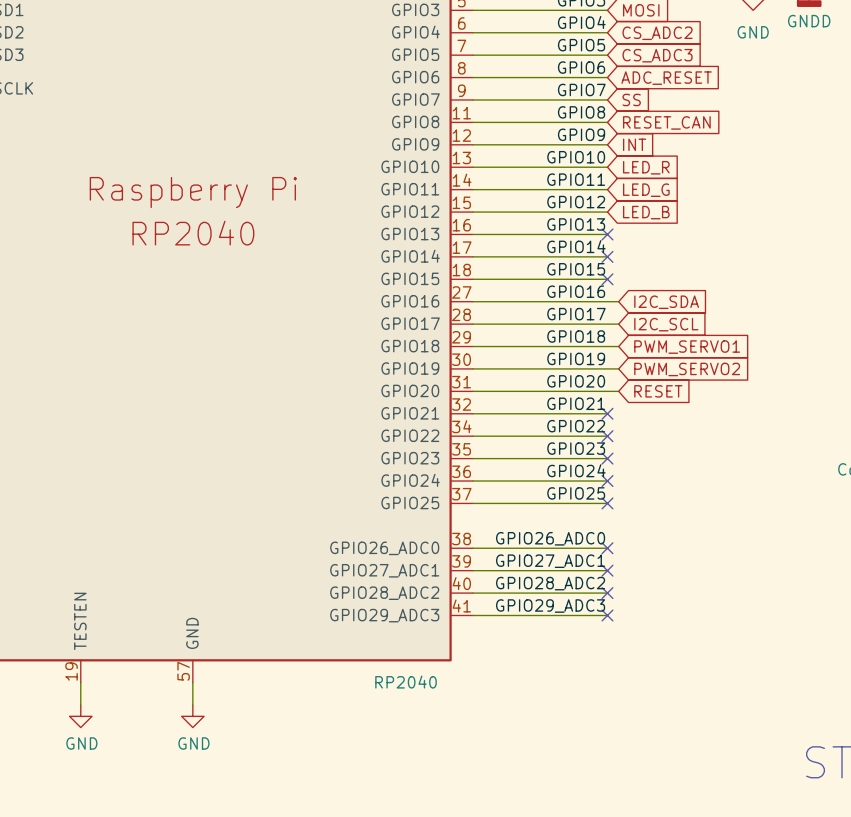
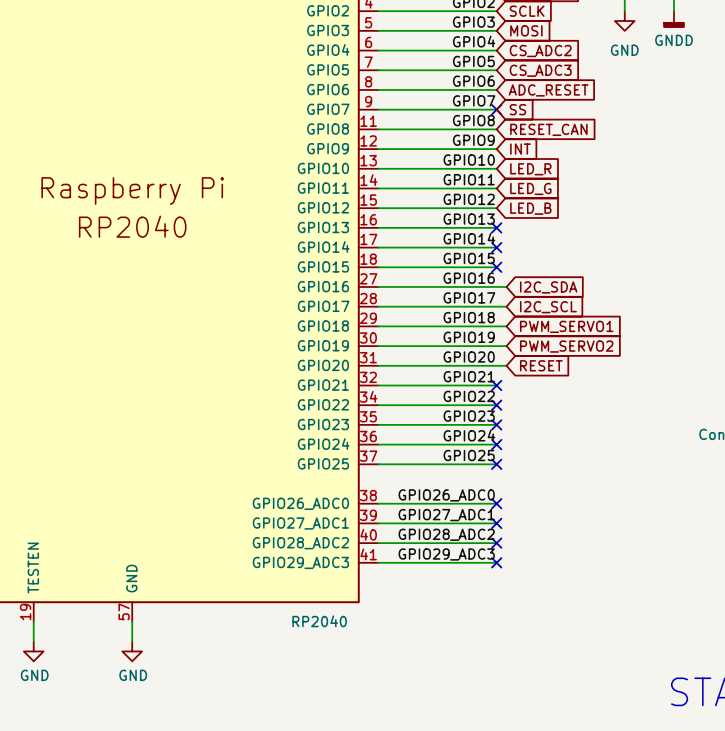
no-connect mark: none -> (496, 109)

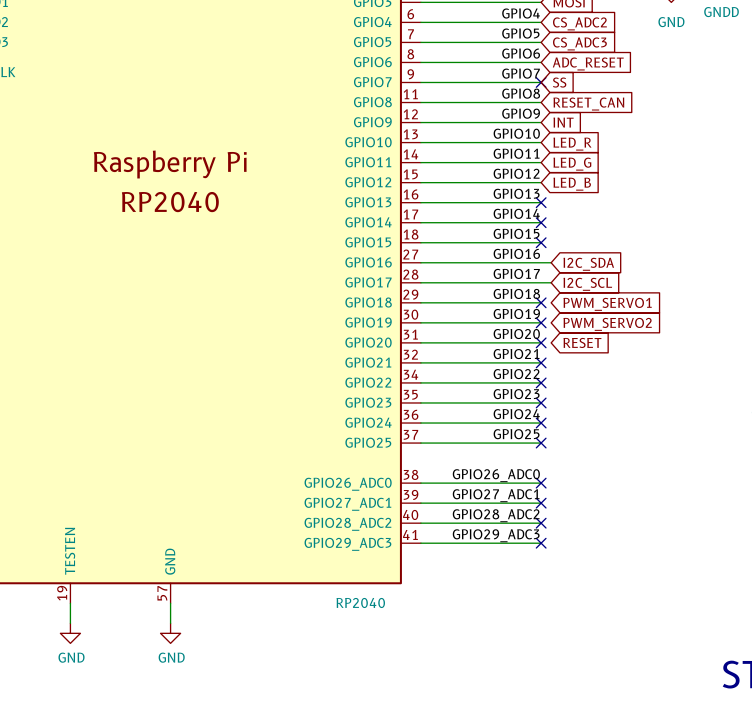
wire: (496, 326) (506, 326) -> none
no-connect mark: none -> (541, 302)
wire: (496, 346) (506, 346) -> none
no-connect mark: none -> (541, 322)
wire: (496, 365) (506, 365) -> none
no-connect mark: none -> (541, 342)

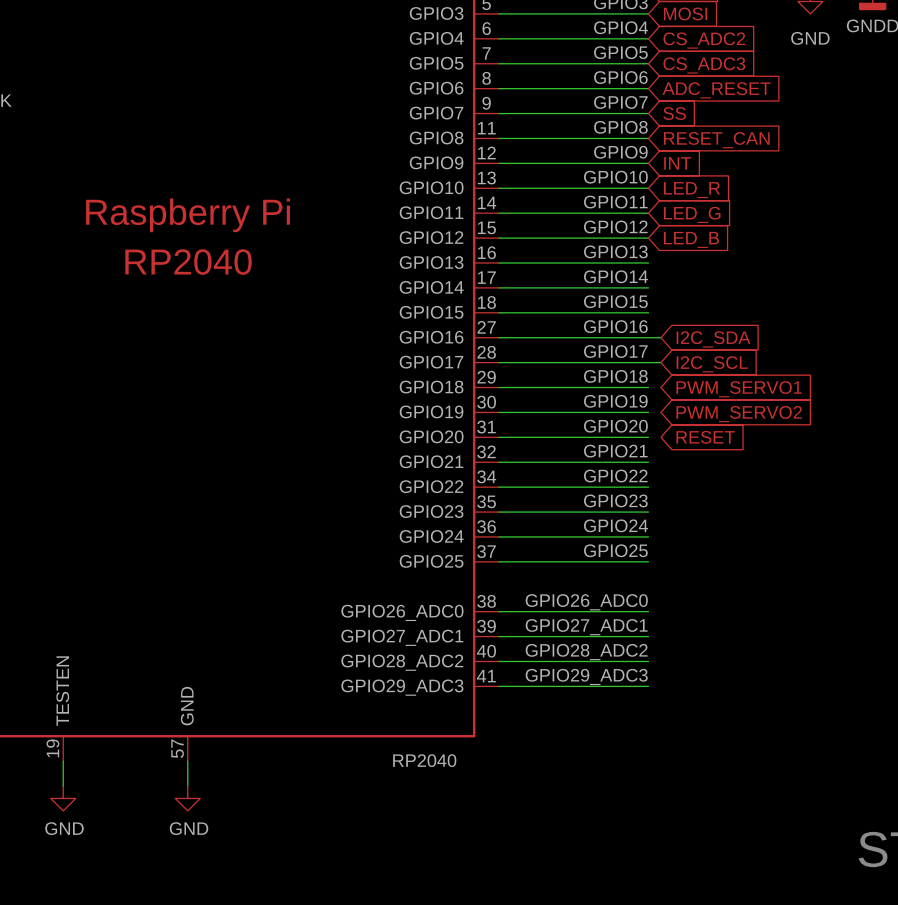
no-connect mark: (541, 82) -> none
no-connect mark: (541, 202) -> none
no-connect mark: (541, 222) -> none
no-connect mark: (541, 242) -> none
no-connect mark: (541, 302) -> none
no-connect mark: (541, 322) -> none
no-connect mark: (541, 342) -> none
no-connect mark: (541, 362) -> none
no-connect mark: (541, 382) -> none
no-connect mark: (541, 402) -> none
no-connect mark: (541, 423) -> none
no-connect mark: (541, 443) -> none
no-connect mark: (541, 483) -> none
no-connect mark: (541, 503) -> none
no-connect mark: (541, 523) -> none
no-connect mark: (541, 543) -> none

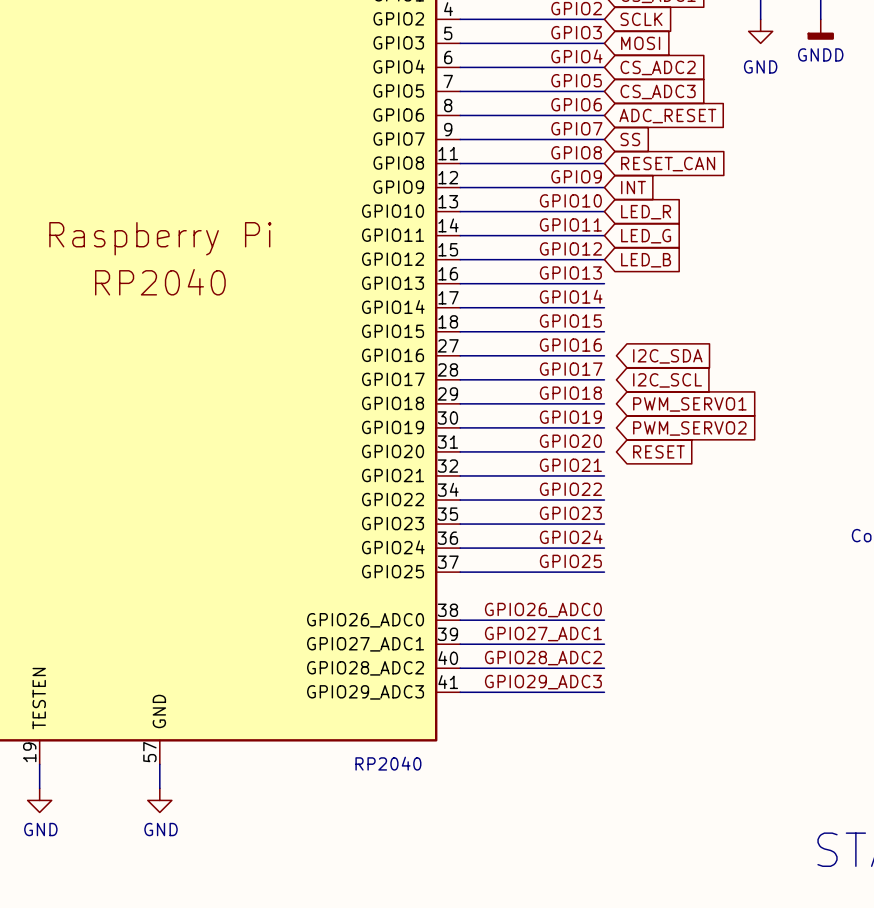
wire: (648, 337) (660, 337) -> none
wire: (648, 362) (660, 362) -> none

